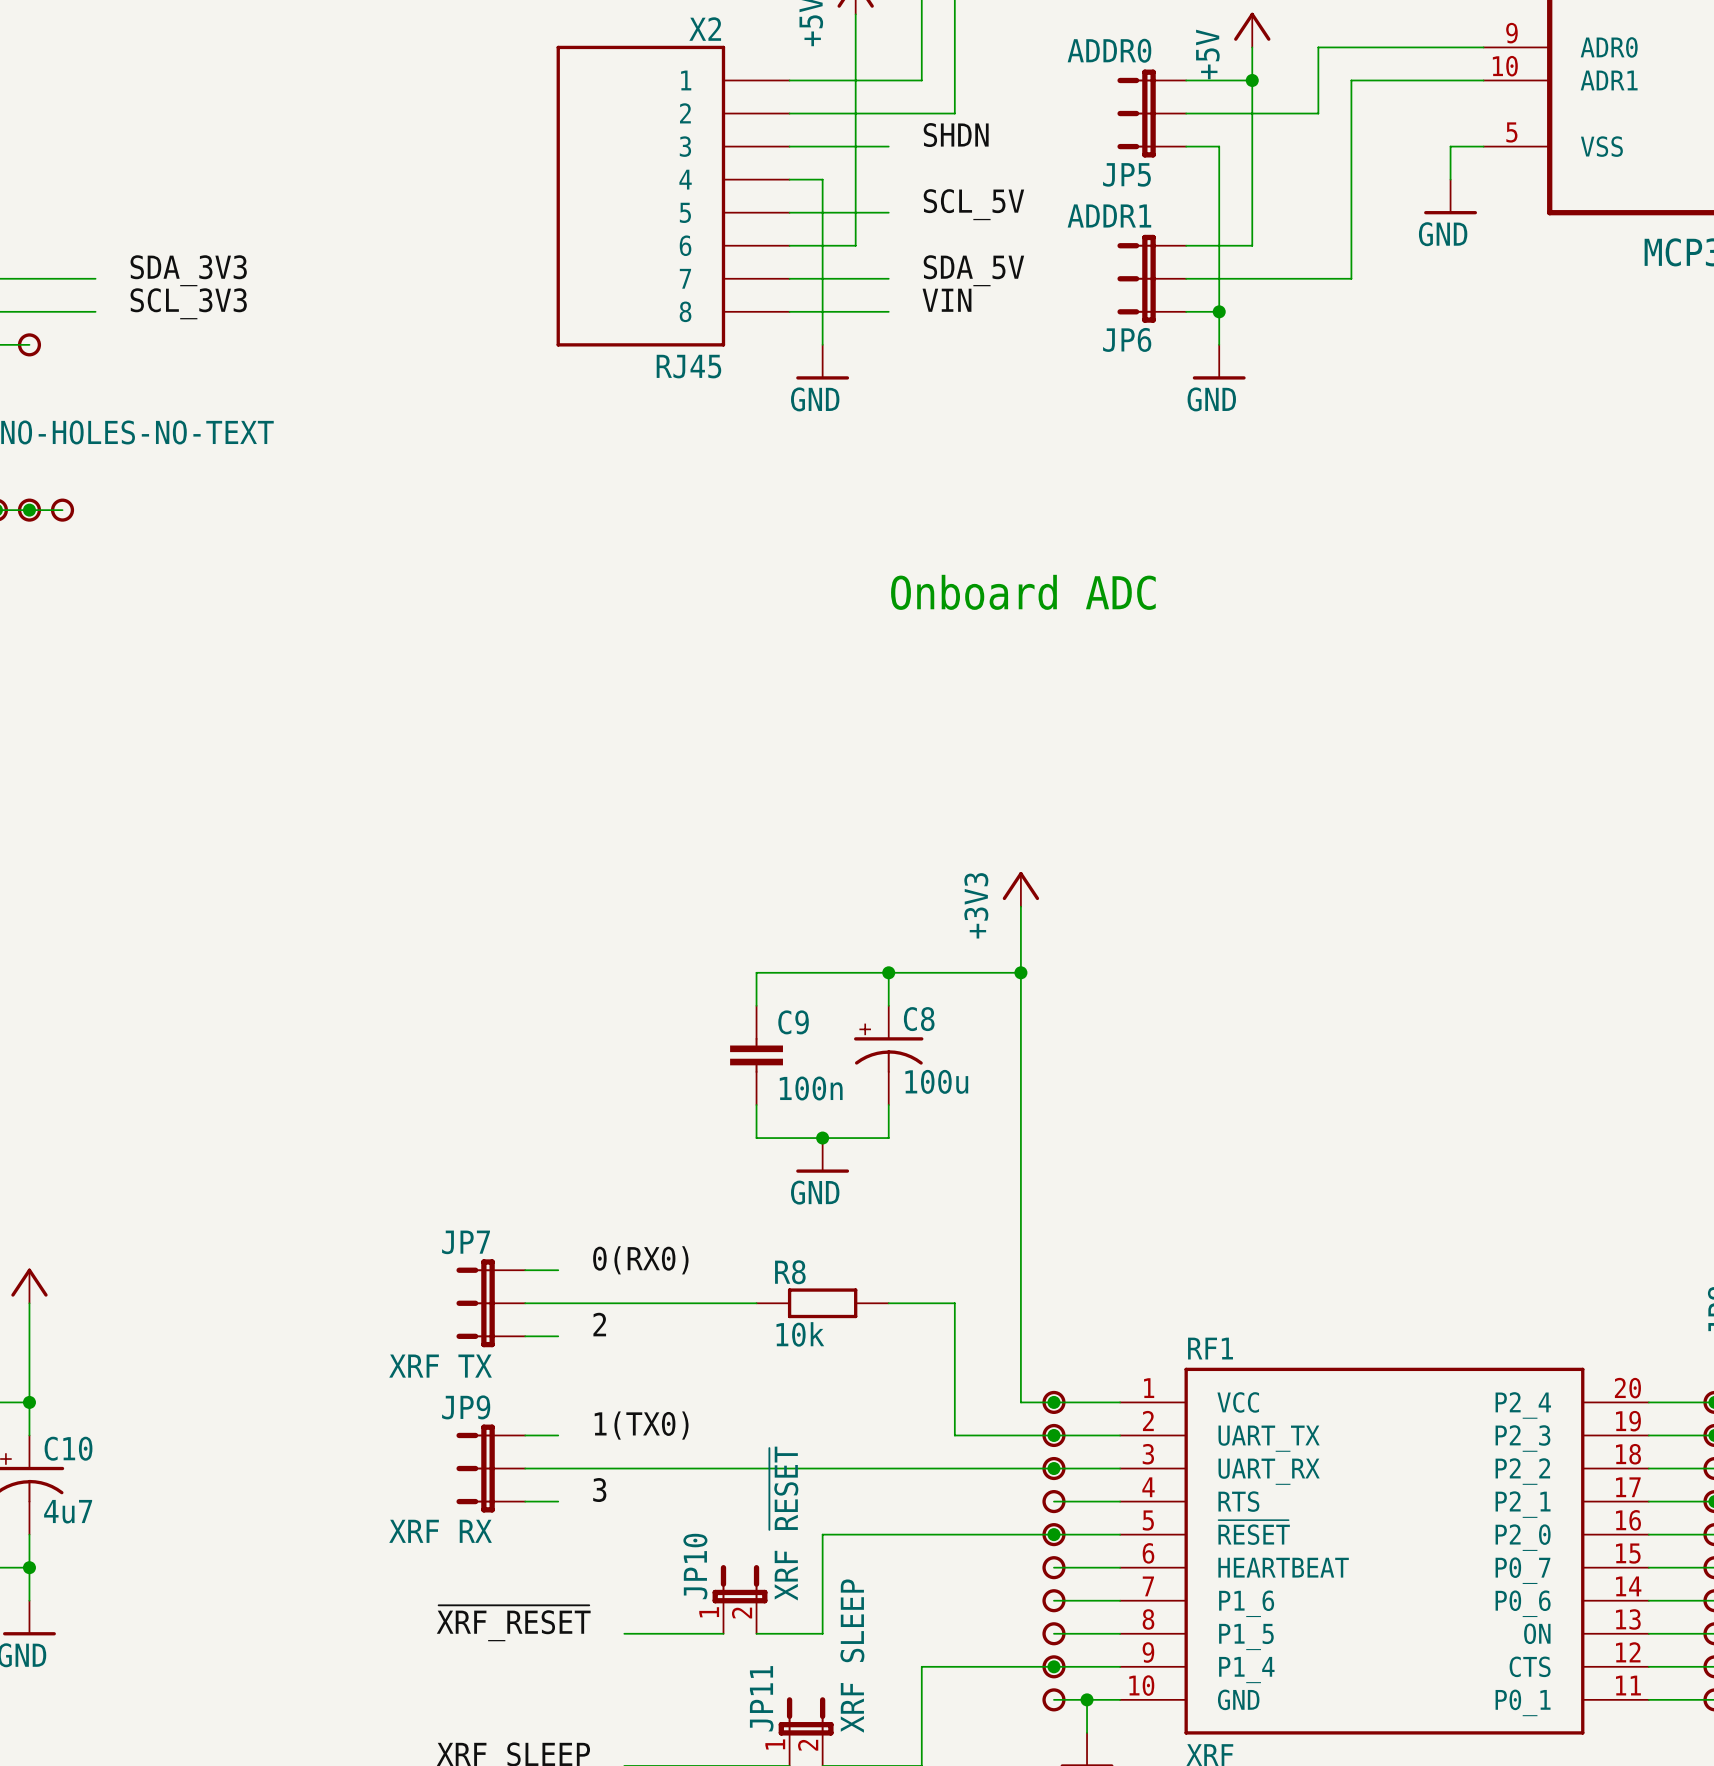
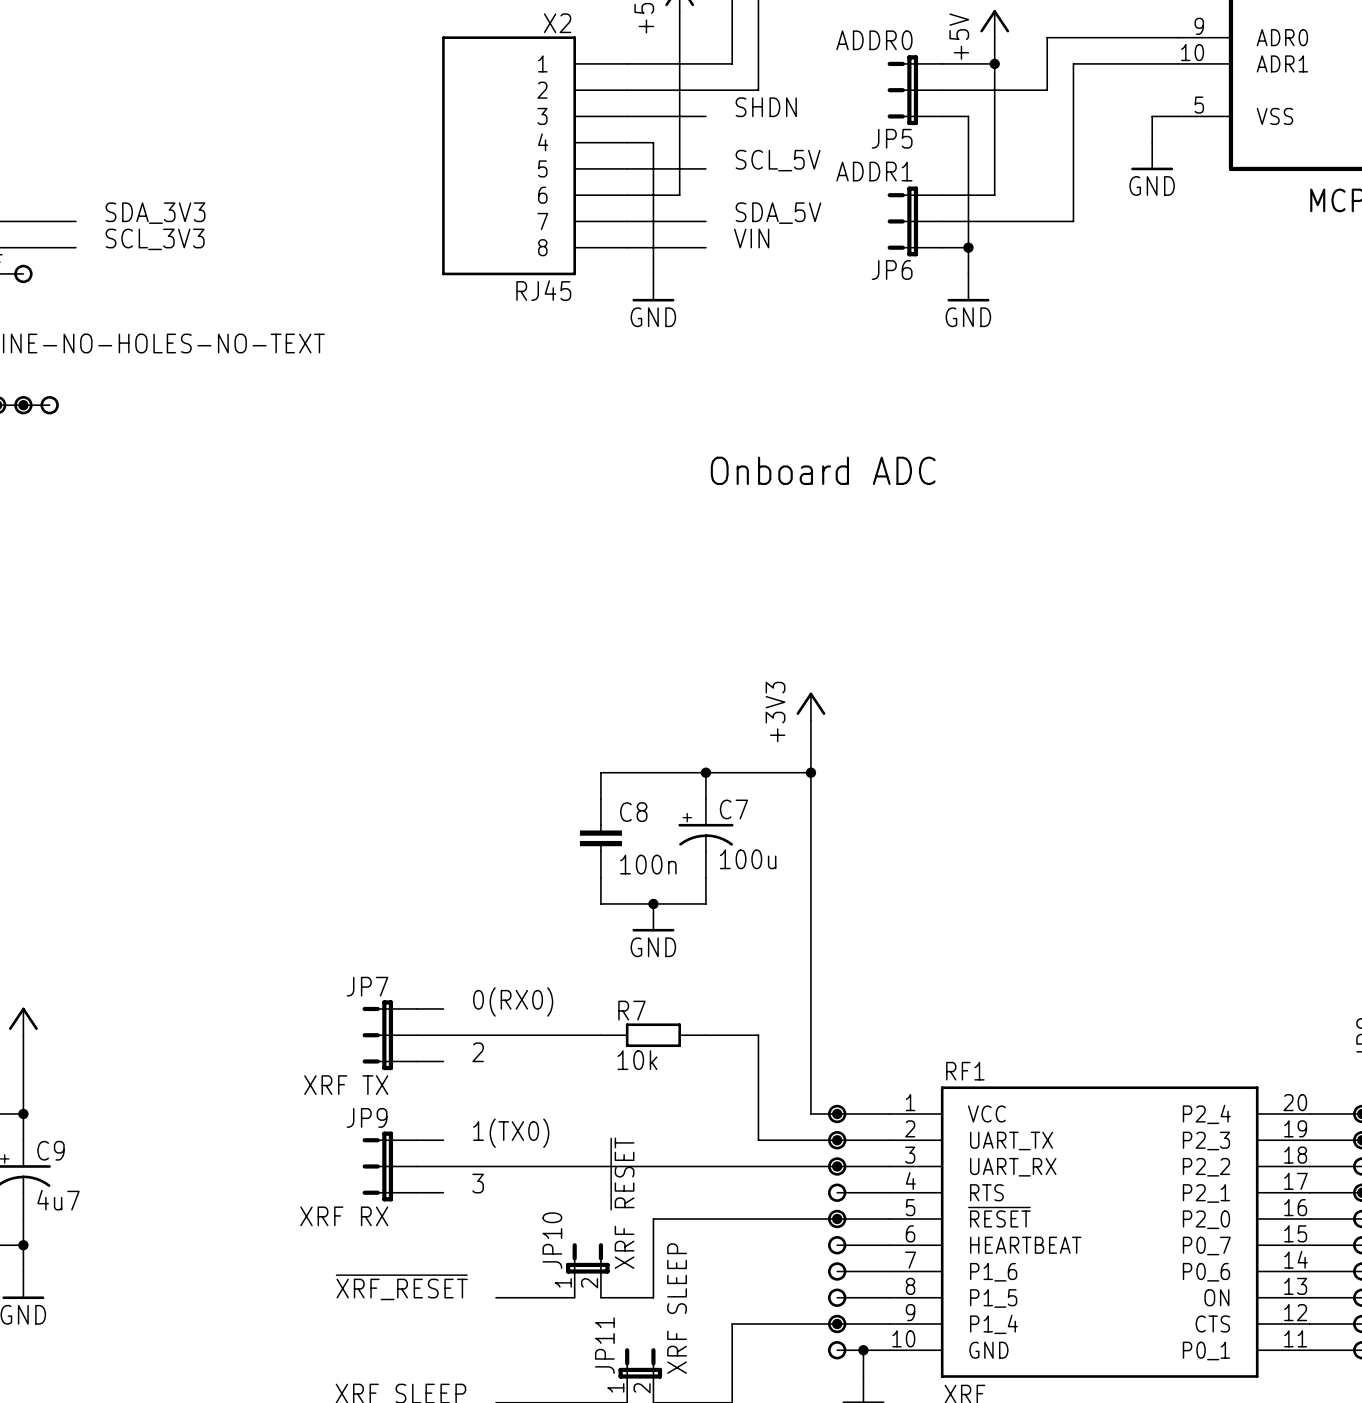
C8 name: C8 (919, 1019) -> C7 (733, 809)
C9 name: C9 (793, 1022) -> C8 (633, 812)
R8 name: R8 (790, 1272) -> R7 (631, 1010)
C10 name: C10 (68, 1448) -> C9 (51, 1150)

